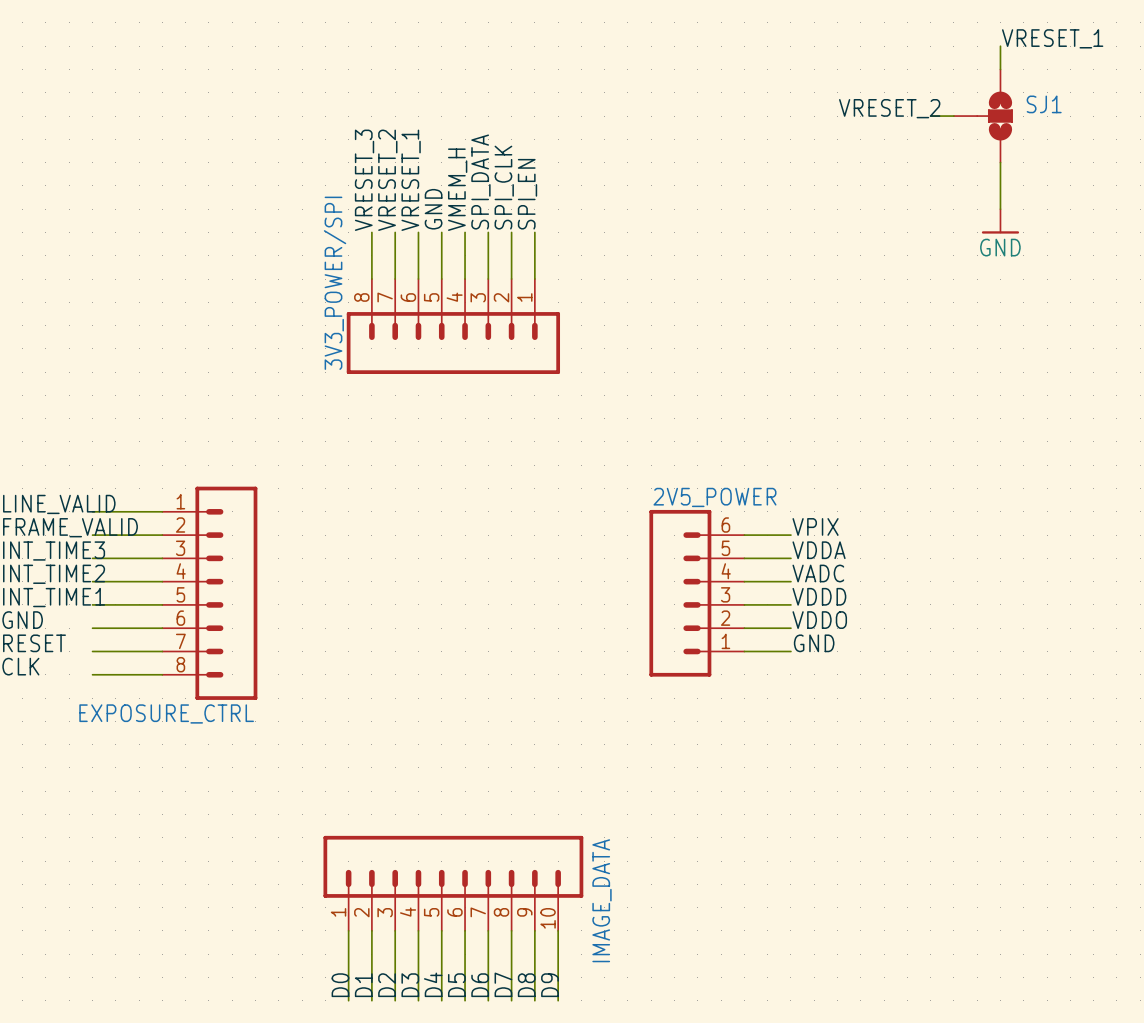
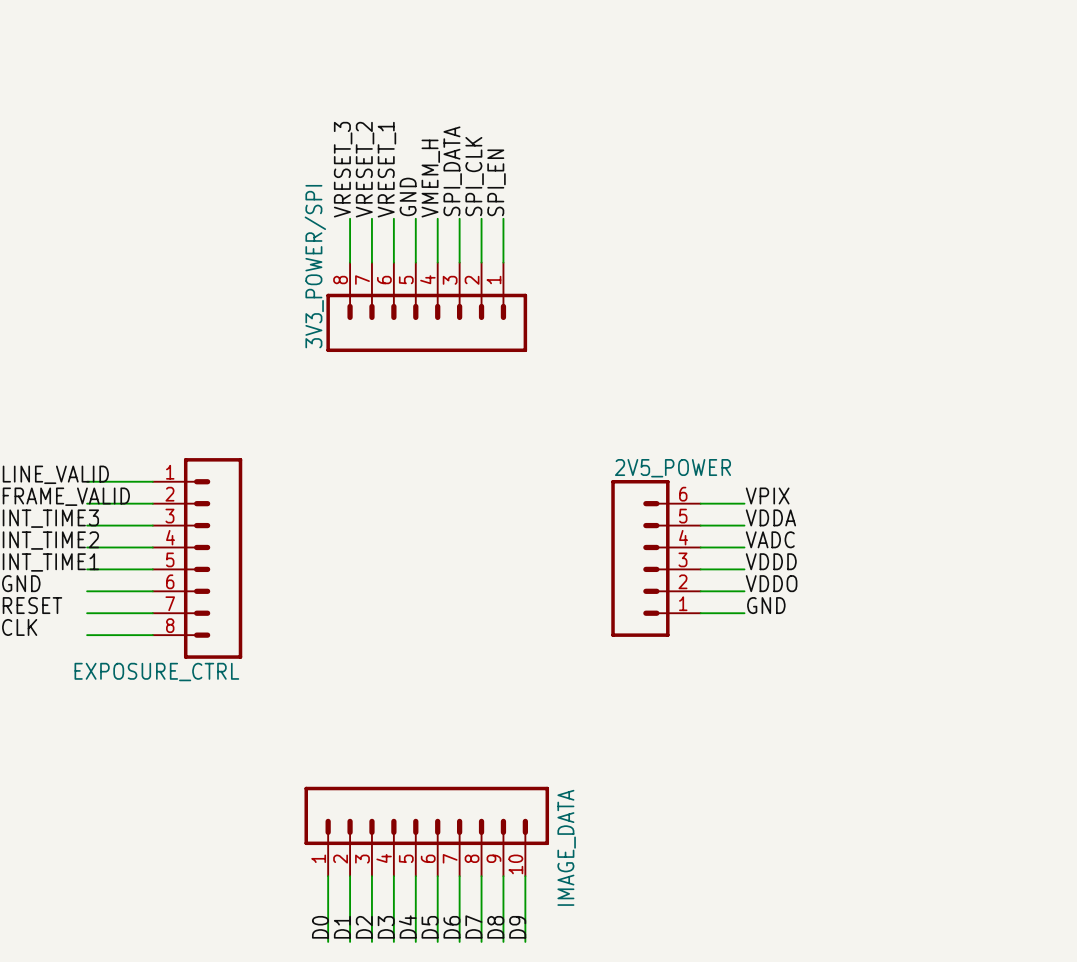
label: VRESET_1 (1052, 38) -> none
wire: (1000, 46) (1000, 69) -> none
label: VRESET_2 (889, 108) -> none
wire: (930, 116) (953, 116) -> none
SJ1: (983, 116) -> none
wire: (1000, 162) (1000, 209) -> none
power symbol: GND (1000, 221) -> none

